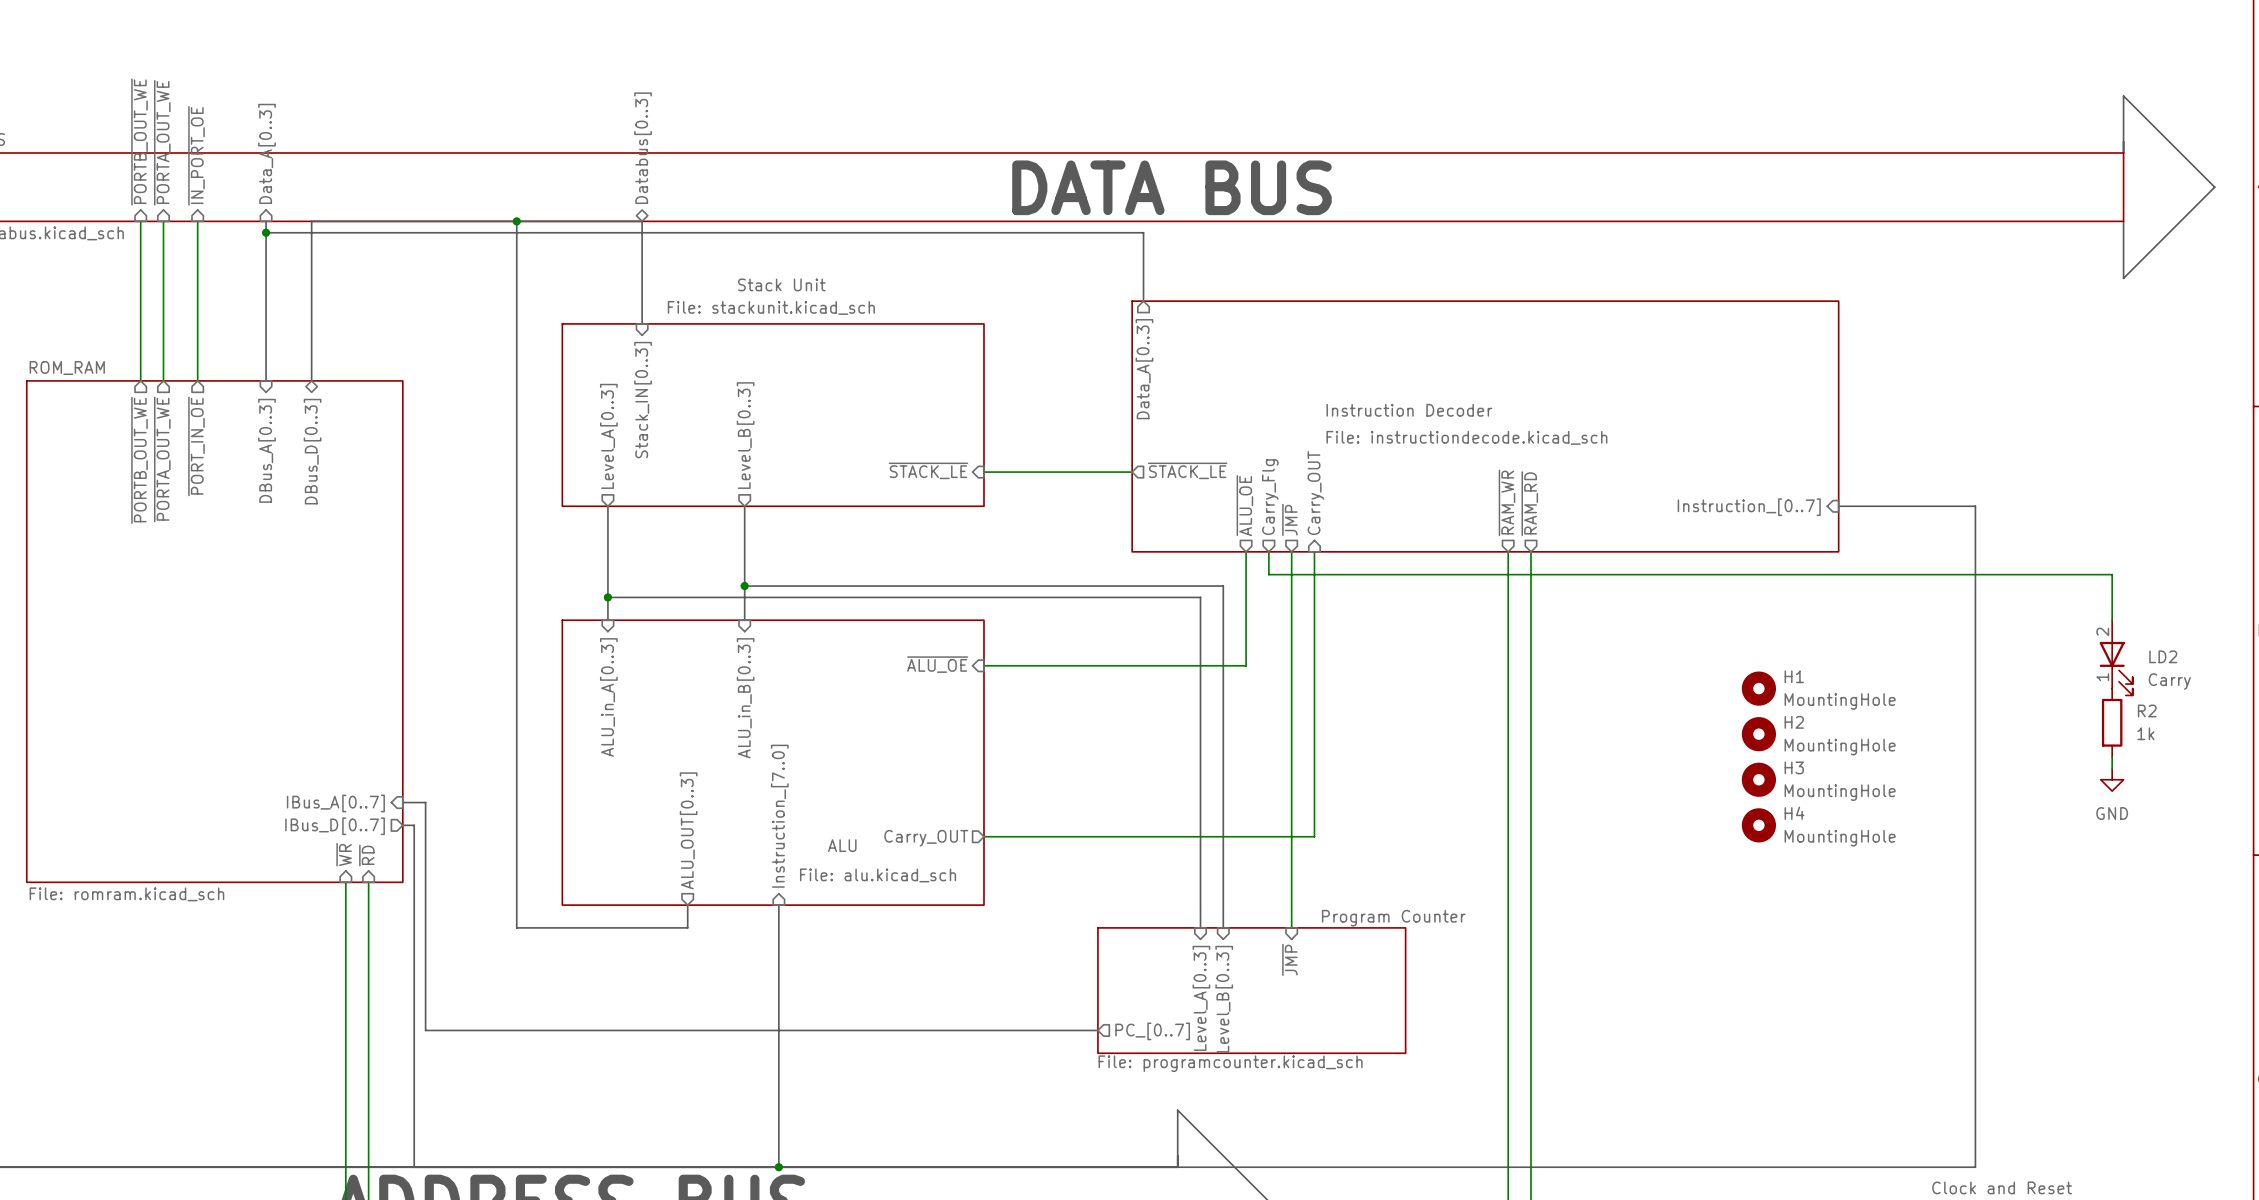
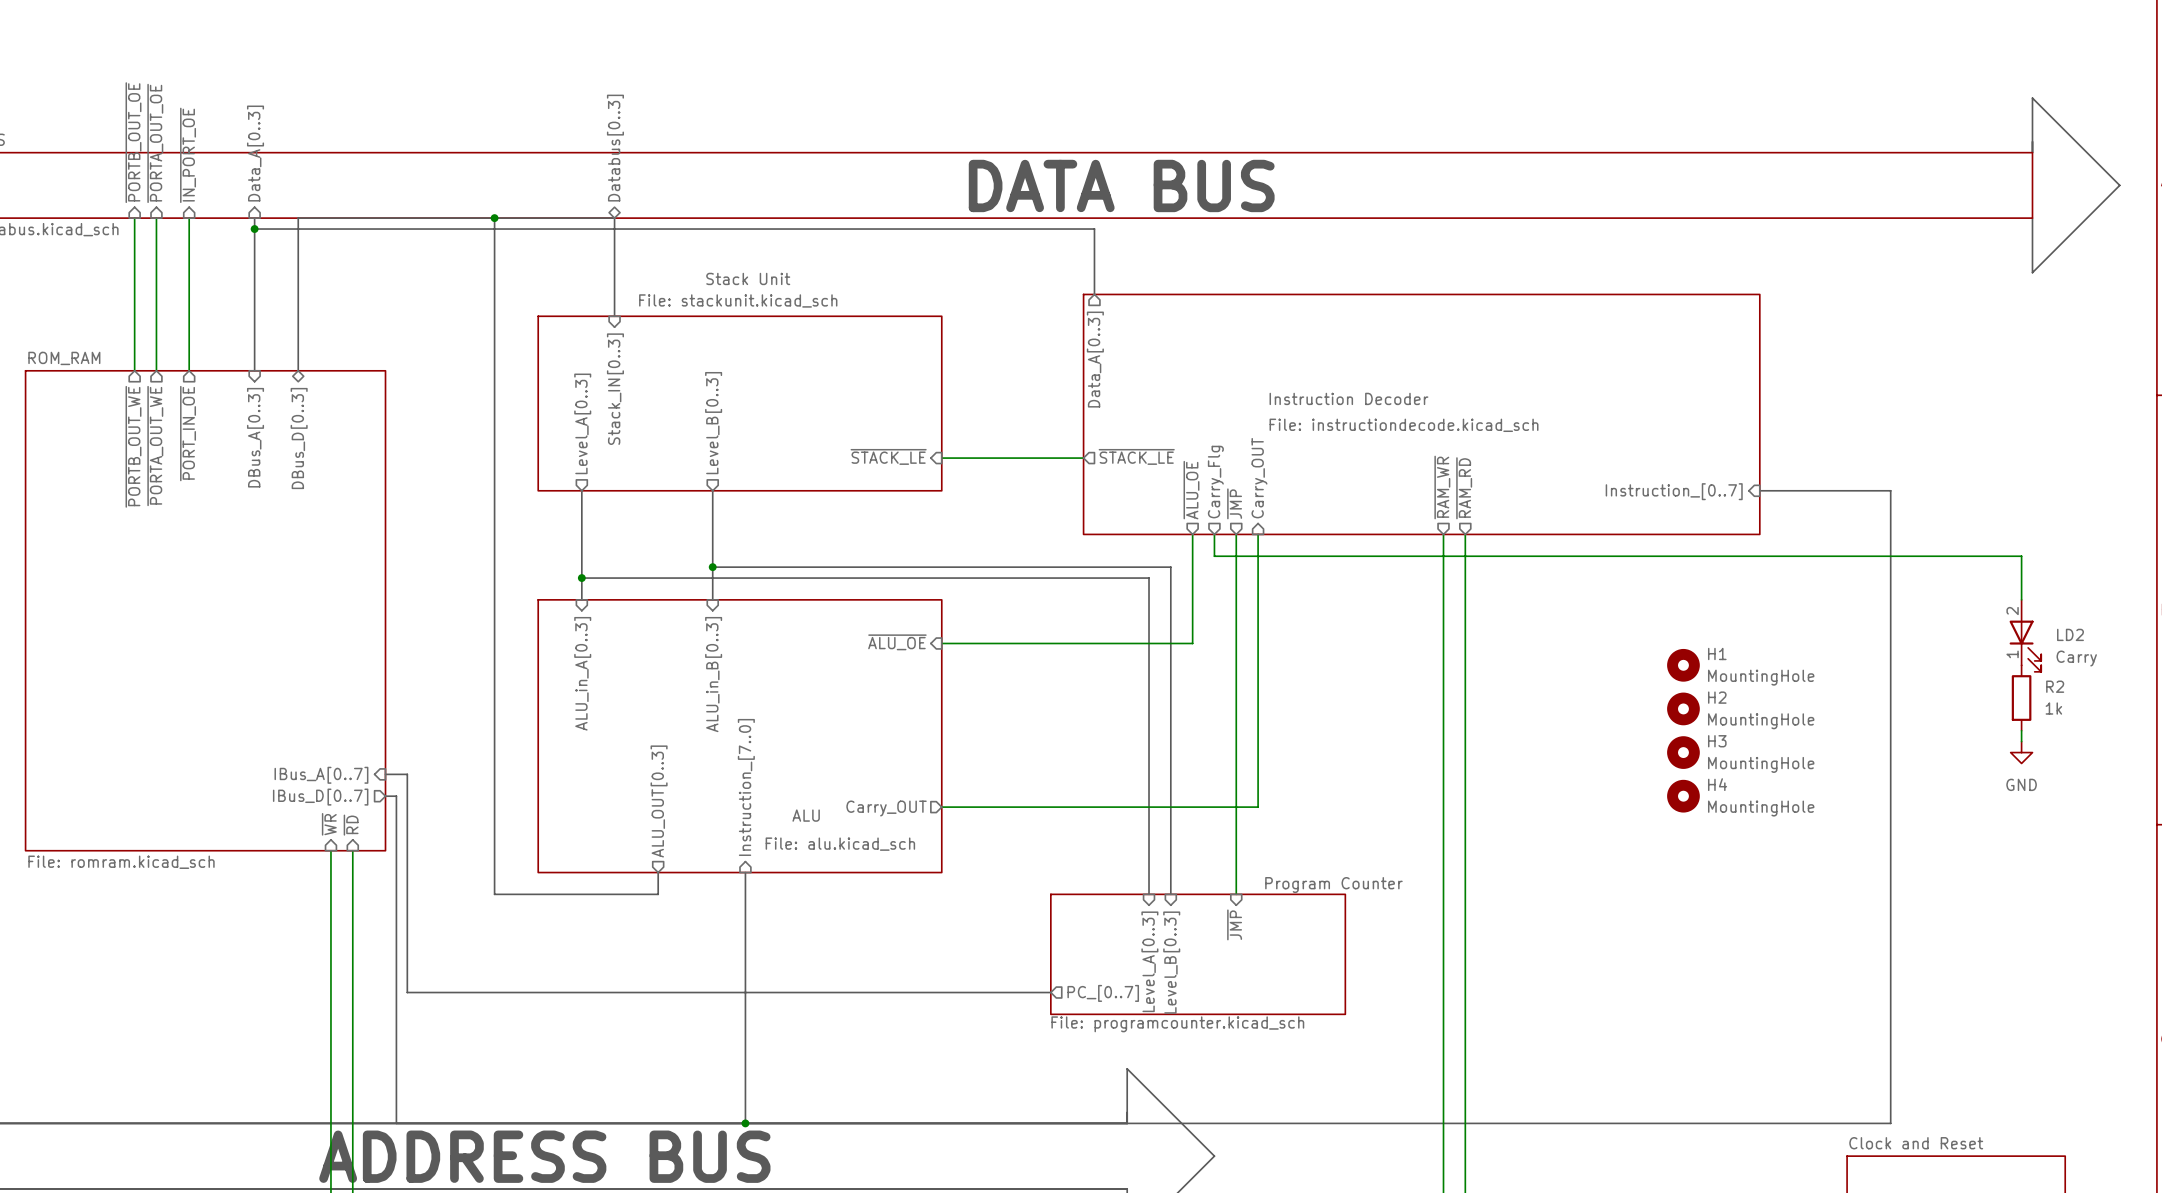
sheet pin: ~{PORTB_OUT_WE} (139, 141) -> ~{PORTB_OUT_OE} (133, 142)
sheet pin: ~{PORTA_OUT_WE} (162, 142) -> ~{PORTA_OUT_OE} (155, 143)

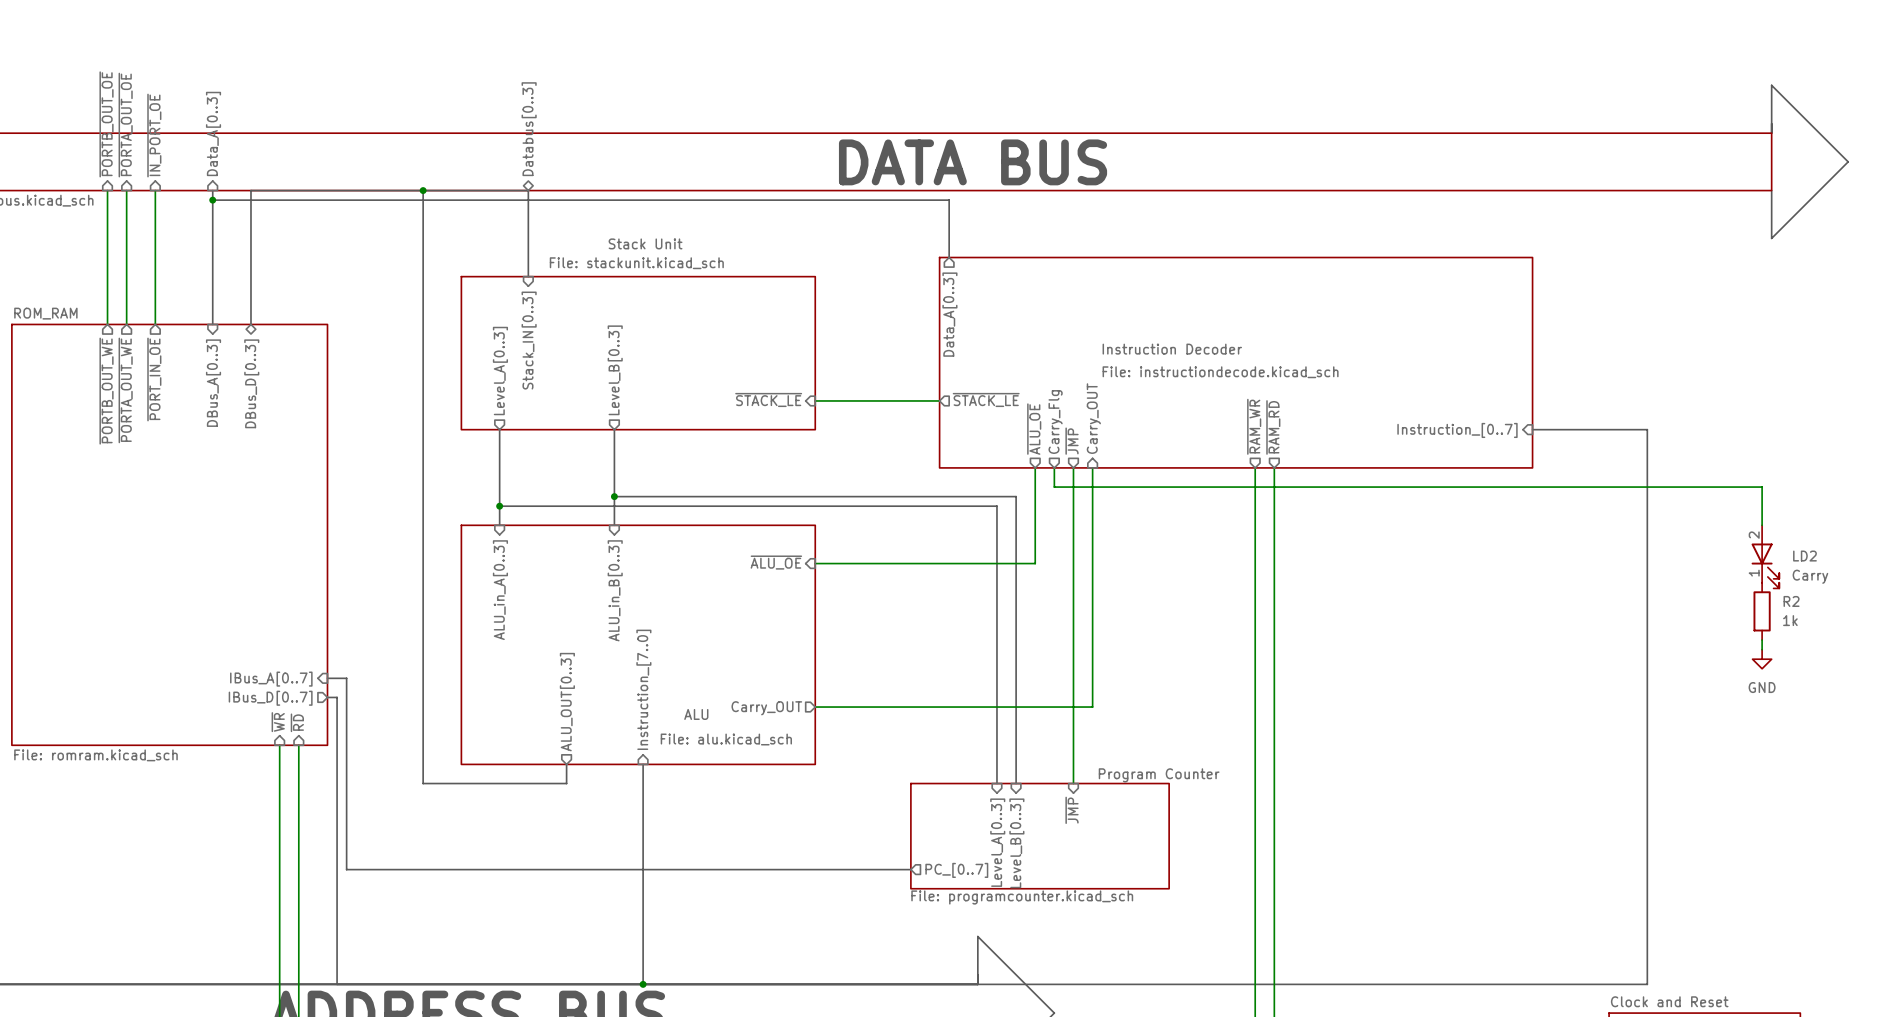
H1: MountingHole (1683, 665) -> none
H2: MountingHole (1683, 708) -> none
H3: MountingHole (1683, 752) -> none
H4: MountingHole (1683, 796) -> none

